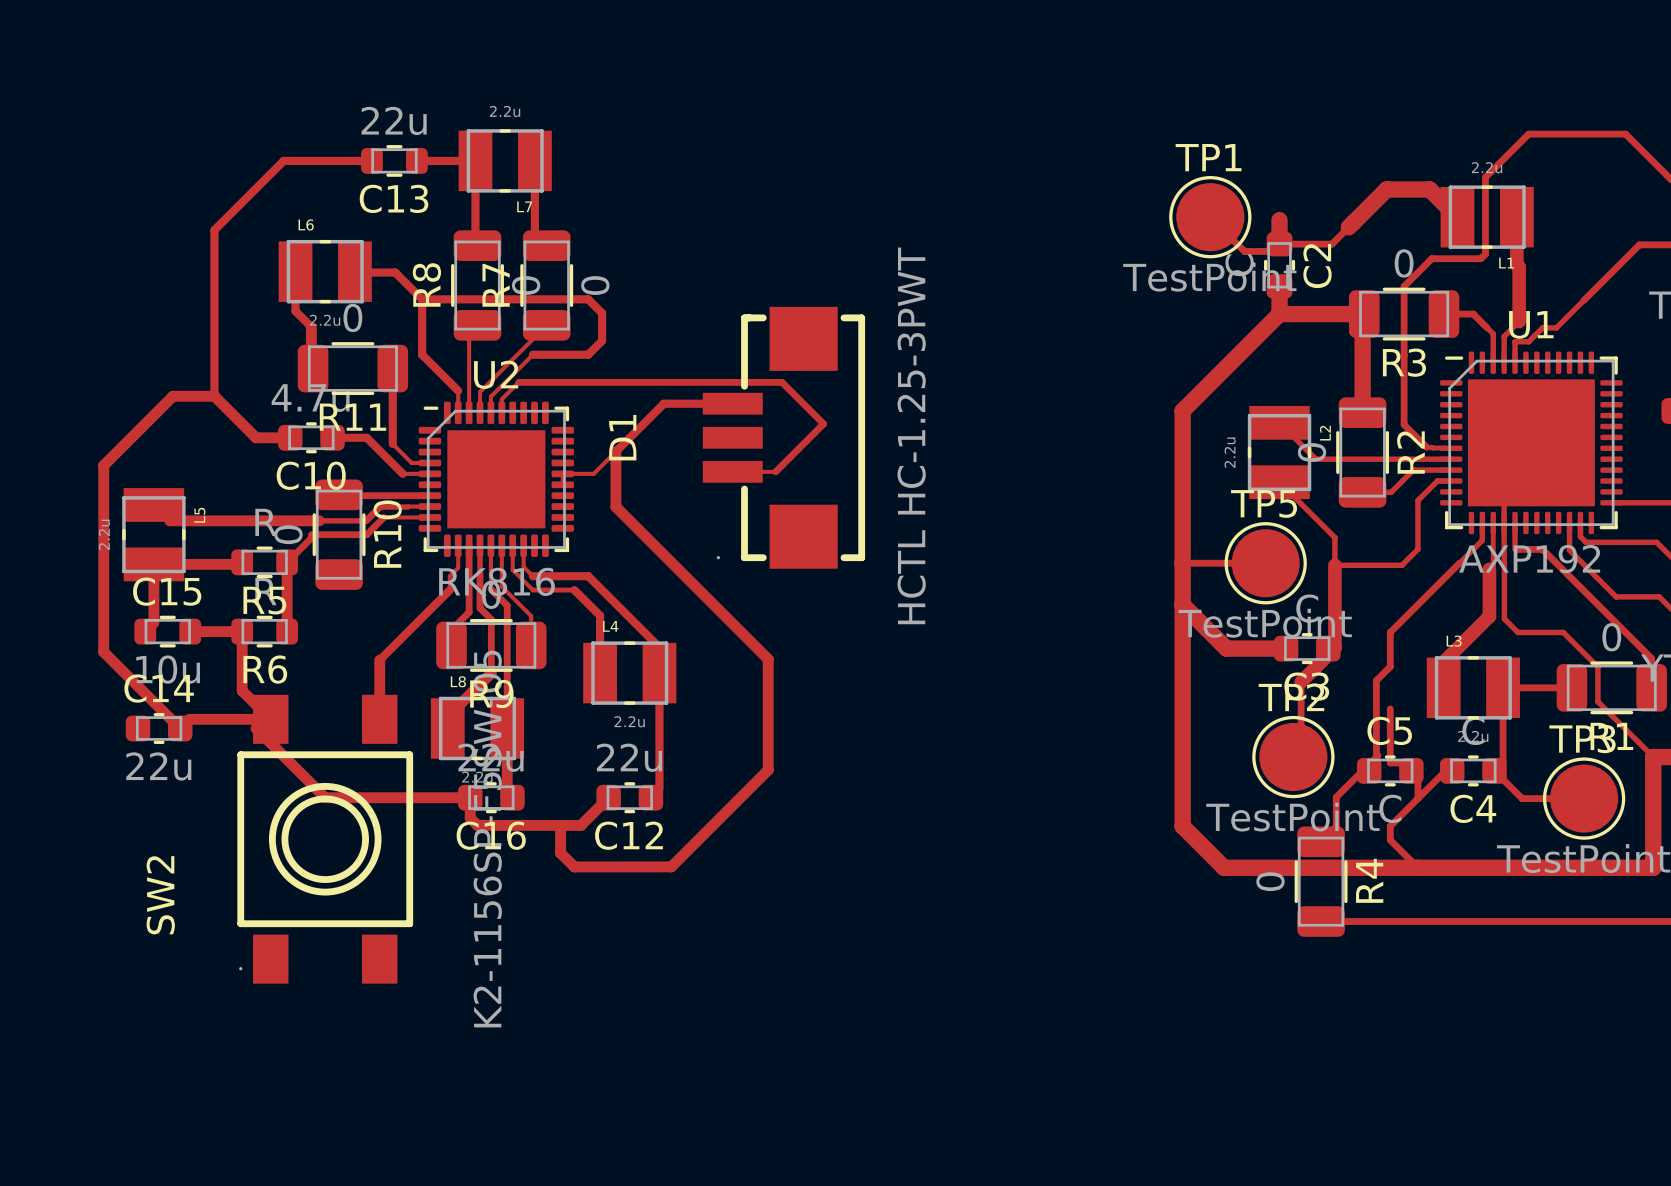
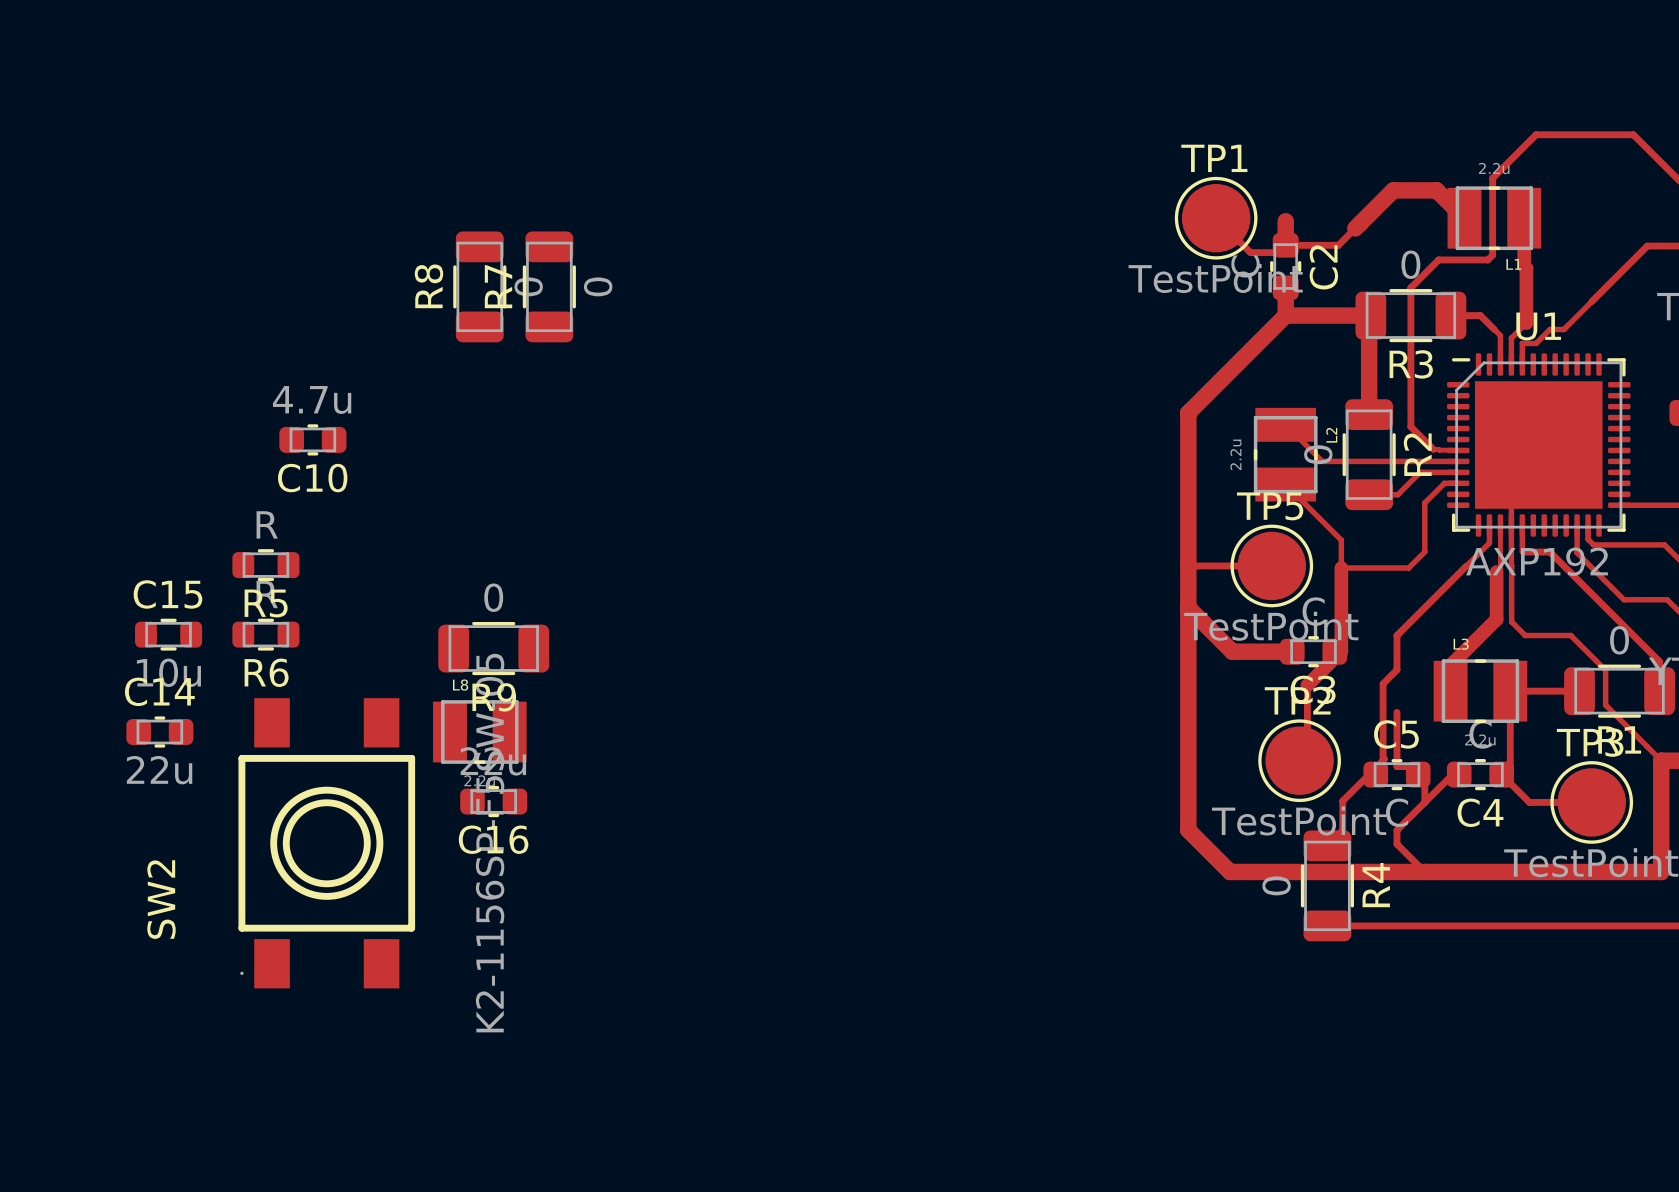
track: (371, 160) (283, 160) (214, 230) (214, 396) -> none
C13: 22u (394, 160) -> none
track: (416, 160) (475, 160) (475, 243) (477, 245) -> none
L7: 2.2u (505, 160) -> none
track: (534, 160) (534, 233) (546, 245) -> none
track: (295, 271) (295, 311) (311, 327) (311, 366) (313, 368) -> none
L6: 2.2u (325, 271) -> none
track: (354, 271) (395, 272) (422, 299) -> none
track: (422, 299) (422, 354) -> none
track: (422, 299) (588, 299) (602, 313) (602, 340) (588, 354) (532, 354) (490, 396) (490, 412) -> none
track: (477, 325) (469, 333) (469, 412) -> none
track: (546, 325) (480, 392) (480, 412) -> none
track: (422, 354) (458, 390) (458, 412) -> none
R11: 0 (352, 368) -> none
track: (392, 368) (392, 444) (411, 462) (429, 462) -> none
track: (214, 396) (256, 437) (290, 437) -> none
track: (214, 396) (172, 396) (103, 465) (103, 652) (180, 728) (189, 719) (270, 719) (242, 690) (242, 631) (190, 631) -> none
track: (732, 403) (663, 403) (615, 451) -> none
track: (501, 412) (501, 399) (518, 382) (782, 382) (823, 423) (775, 471) (732, 471) -> none
track: (332, 437) (366, 437) (402, 473) (429, 473) -> none
D1: HCTL HC-1.25-3PWT (783, 437) -> none
track: (615, 451) (615, 507) (768, 659) (768, 770) (671, 866) (574, 866) (560, 853) (560, 825) -> none
track: (615, 451) (593, 473) (562, 473) (562, 484) -> none
U2: RK816 (496, 479) -> none
track: (341, 495) (429, 495) -> none
track: (153, 504) (169, 520) (366, 520) (379, 507) (429, 506) -> none
track: (429, 517) (383, 517) (366, 534) (311, 534) (311, 538) (287, 562) -> none
L5: 2.2u (153, 534) -> none
R10: 0 (339, 534) -> none
track: (458, 545) (458, 567) (449, 576) (449, 590) (379, 660) (379, 719) -> none
track: (469, 545) (469, 612) (451, 629) (451, 645) -> none
track: (480, 545) (480, 608) (491, 619) (491, 673) (447, 716) (447, 728) -> none
track: (490, 545) (490, 589) (507, 605) (507, 792) (512, 797) -> none
track: (501, 545) (501, 586) (531, 616) (531, 645) -> none
track: (512, 545) (512, 569) (532, 590) (574, 590) (600, 615) (600, 673) -> none
track: (523, 545) (523, 566) (532, 576) (588, 576) (659, 647) (659, 789) (650, 797) -> none
track: (242, 562) (240, 564) (153, 564) -> none
track: (287, 562) (287, 631) -> none
track: (153, 564) (153, 622) (145, 631) -> none
L4: 2.2u (629, 673) -> none
track: (256, 709) (256, 728) (325, 797) (470, 797) (470, 818) (477, 825) (580, 825) (608, 797) -> none
C12: 22u (629, 797) -> none

